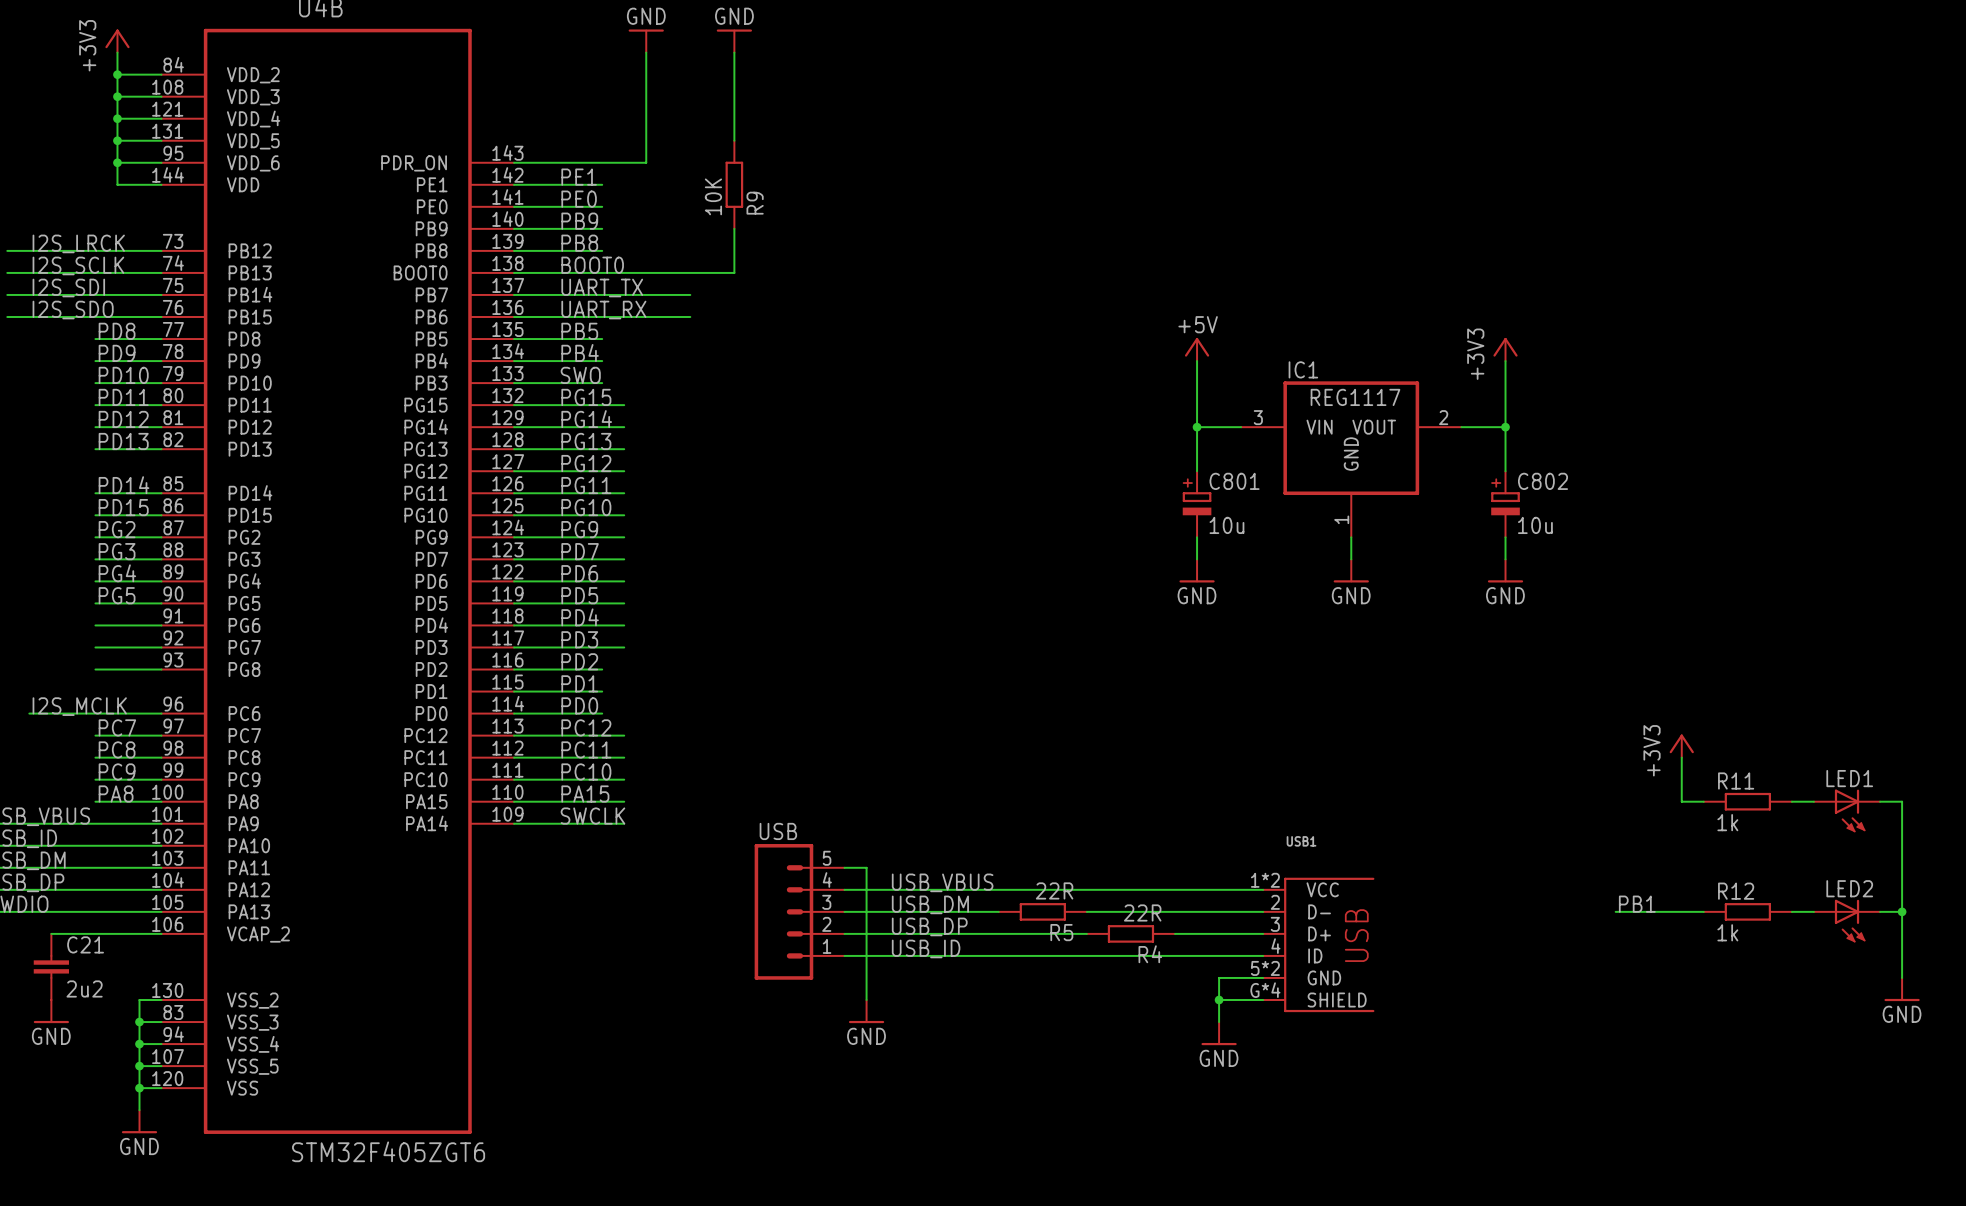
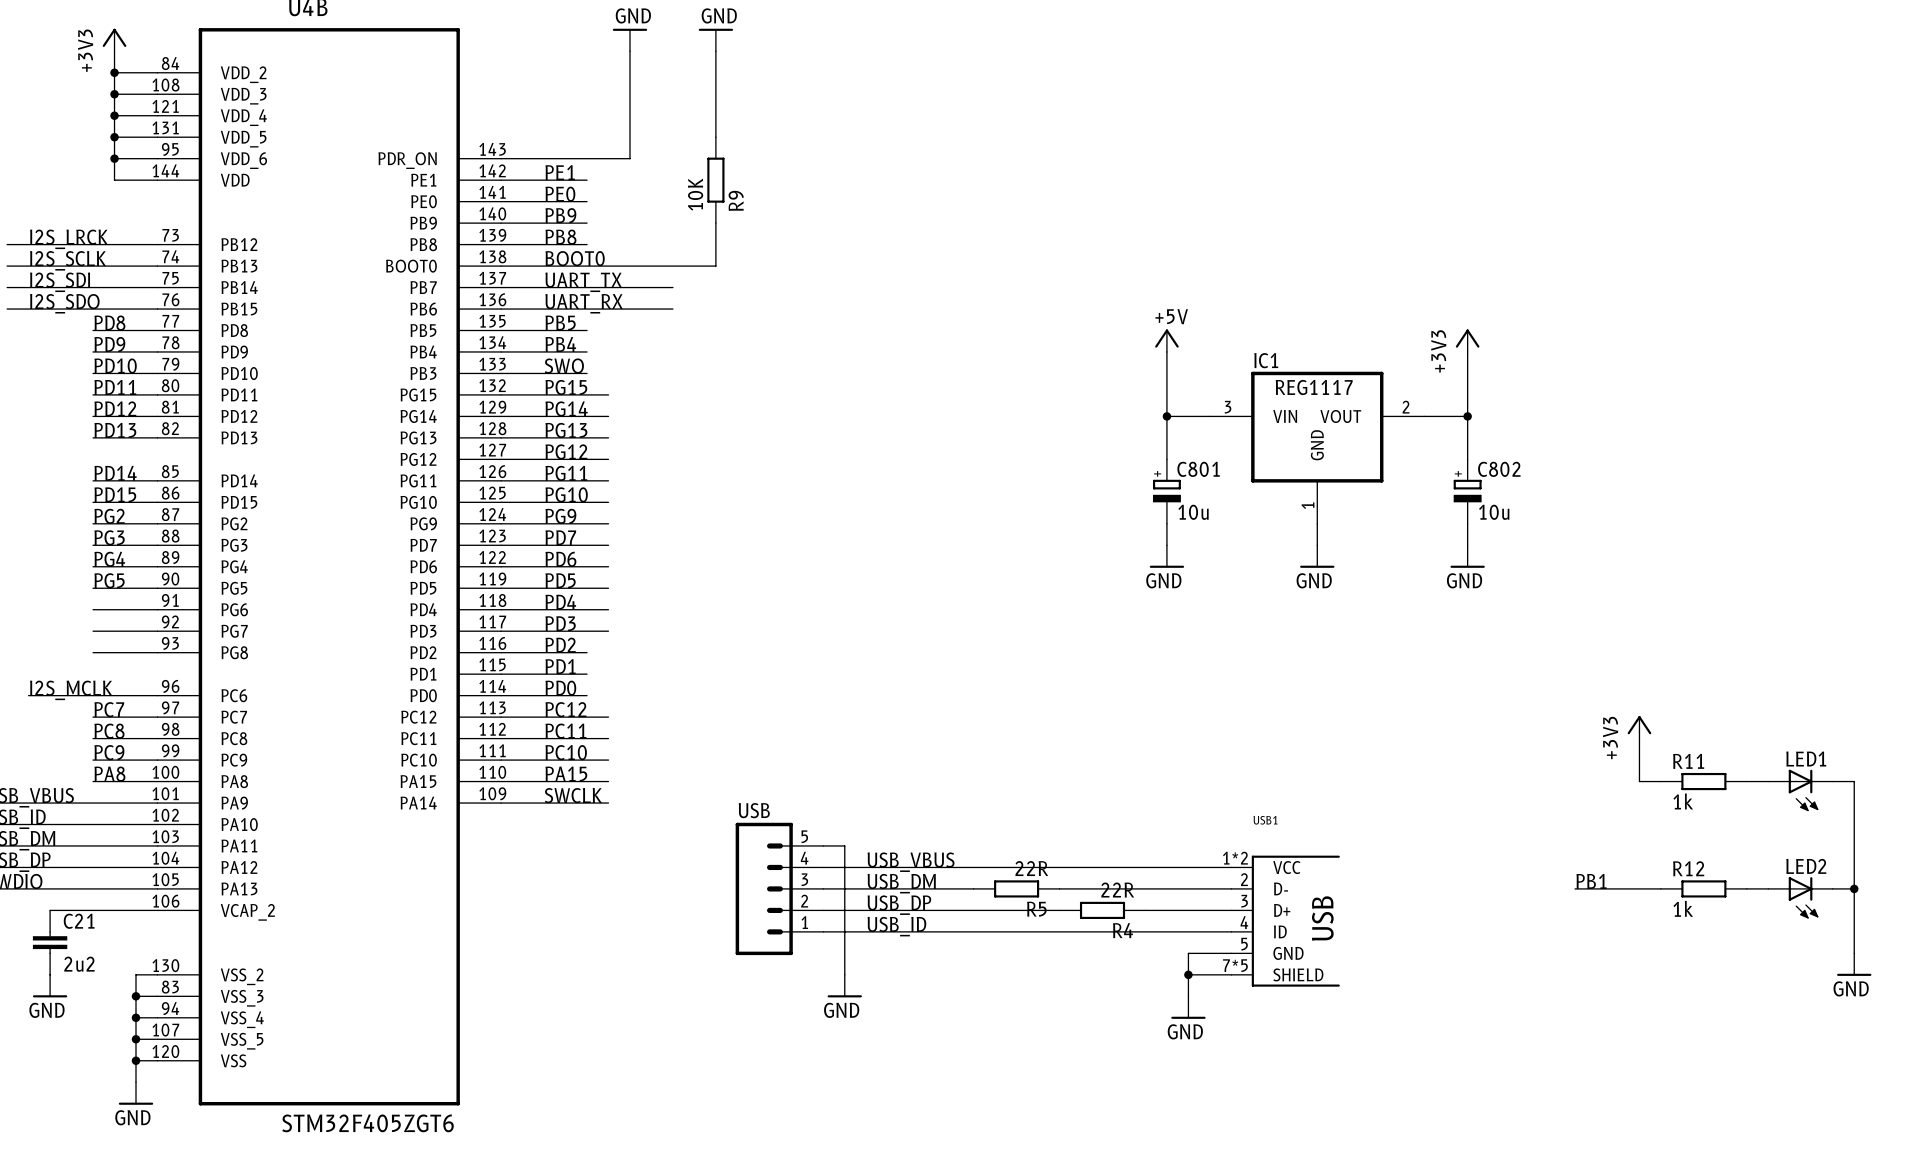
USB1 pin number: 5*2 (1265, 968) -> 5 (1244, 944)
USB1 pin number: G*4 (1265, 990) -> 7*5 (1235, 965)

